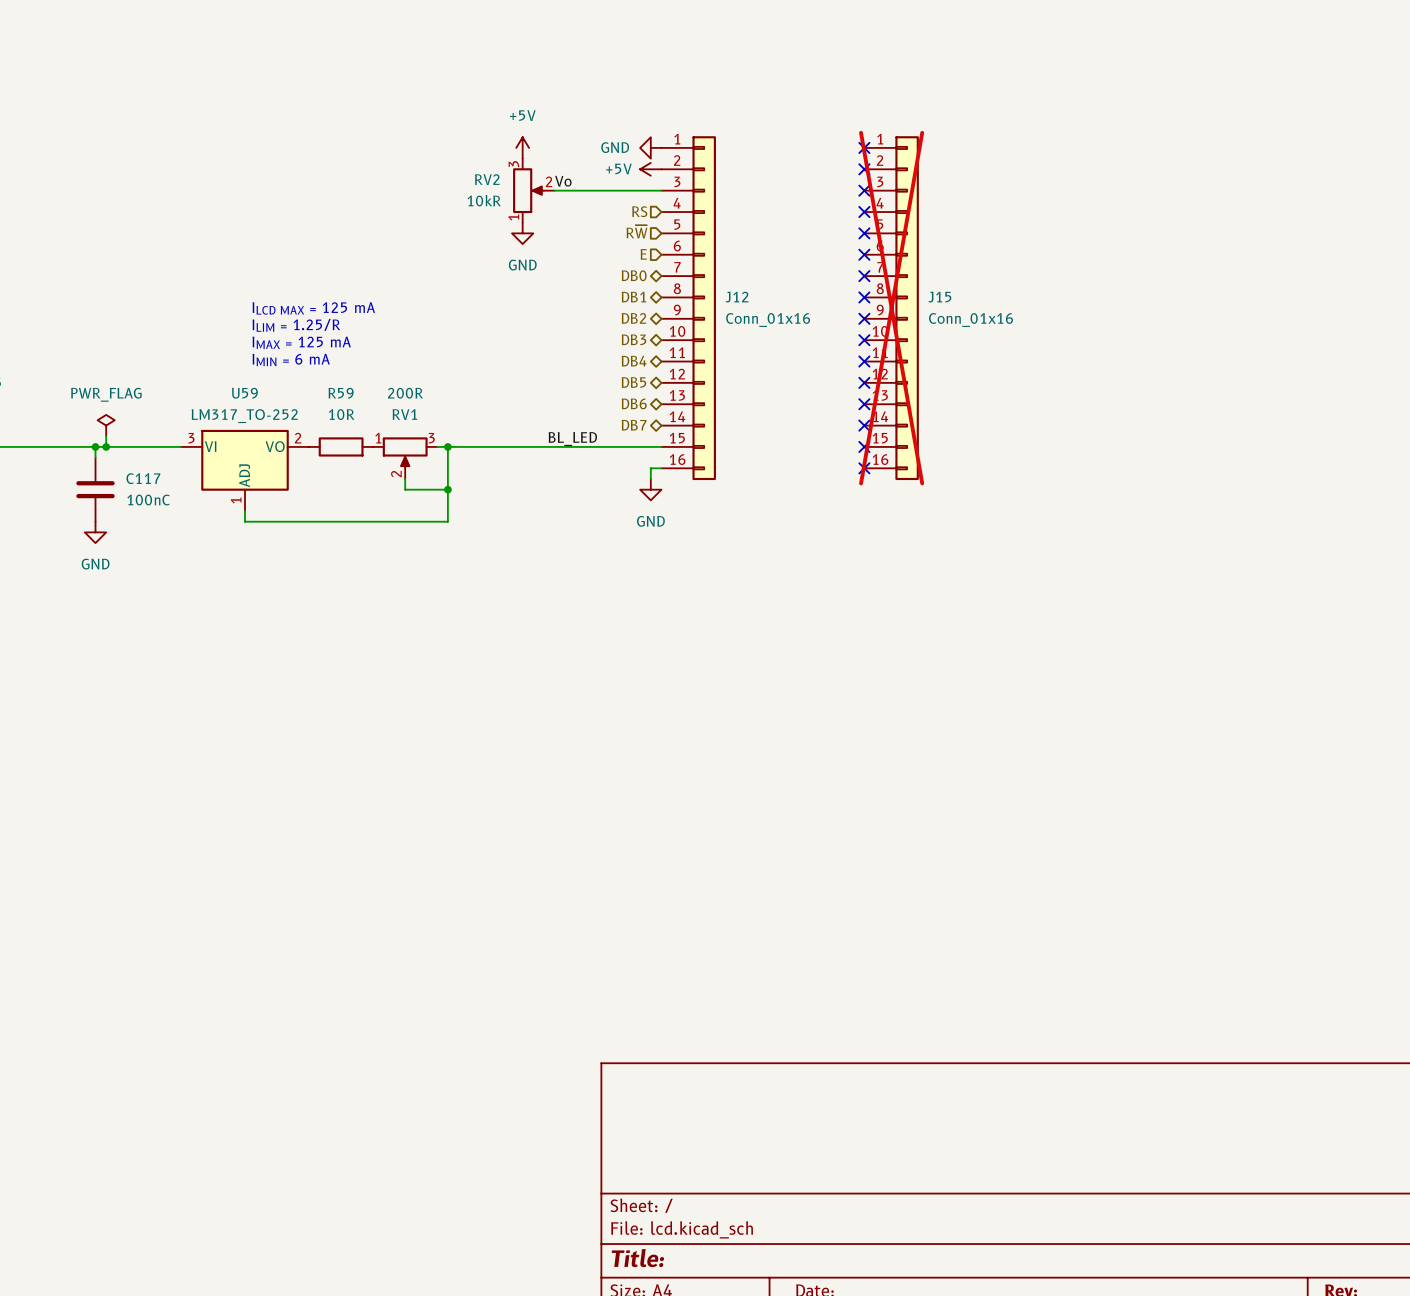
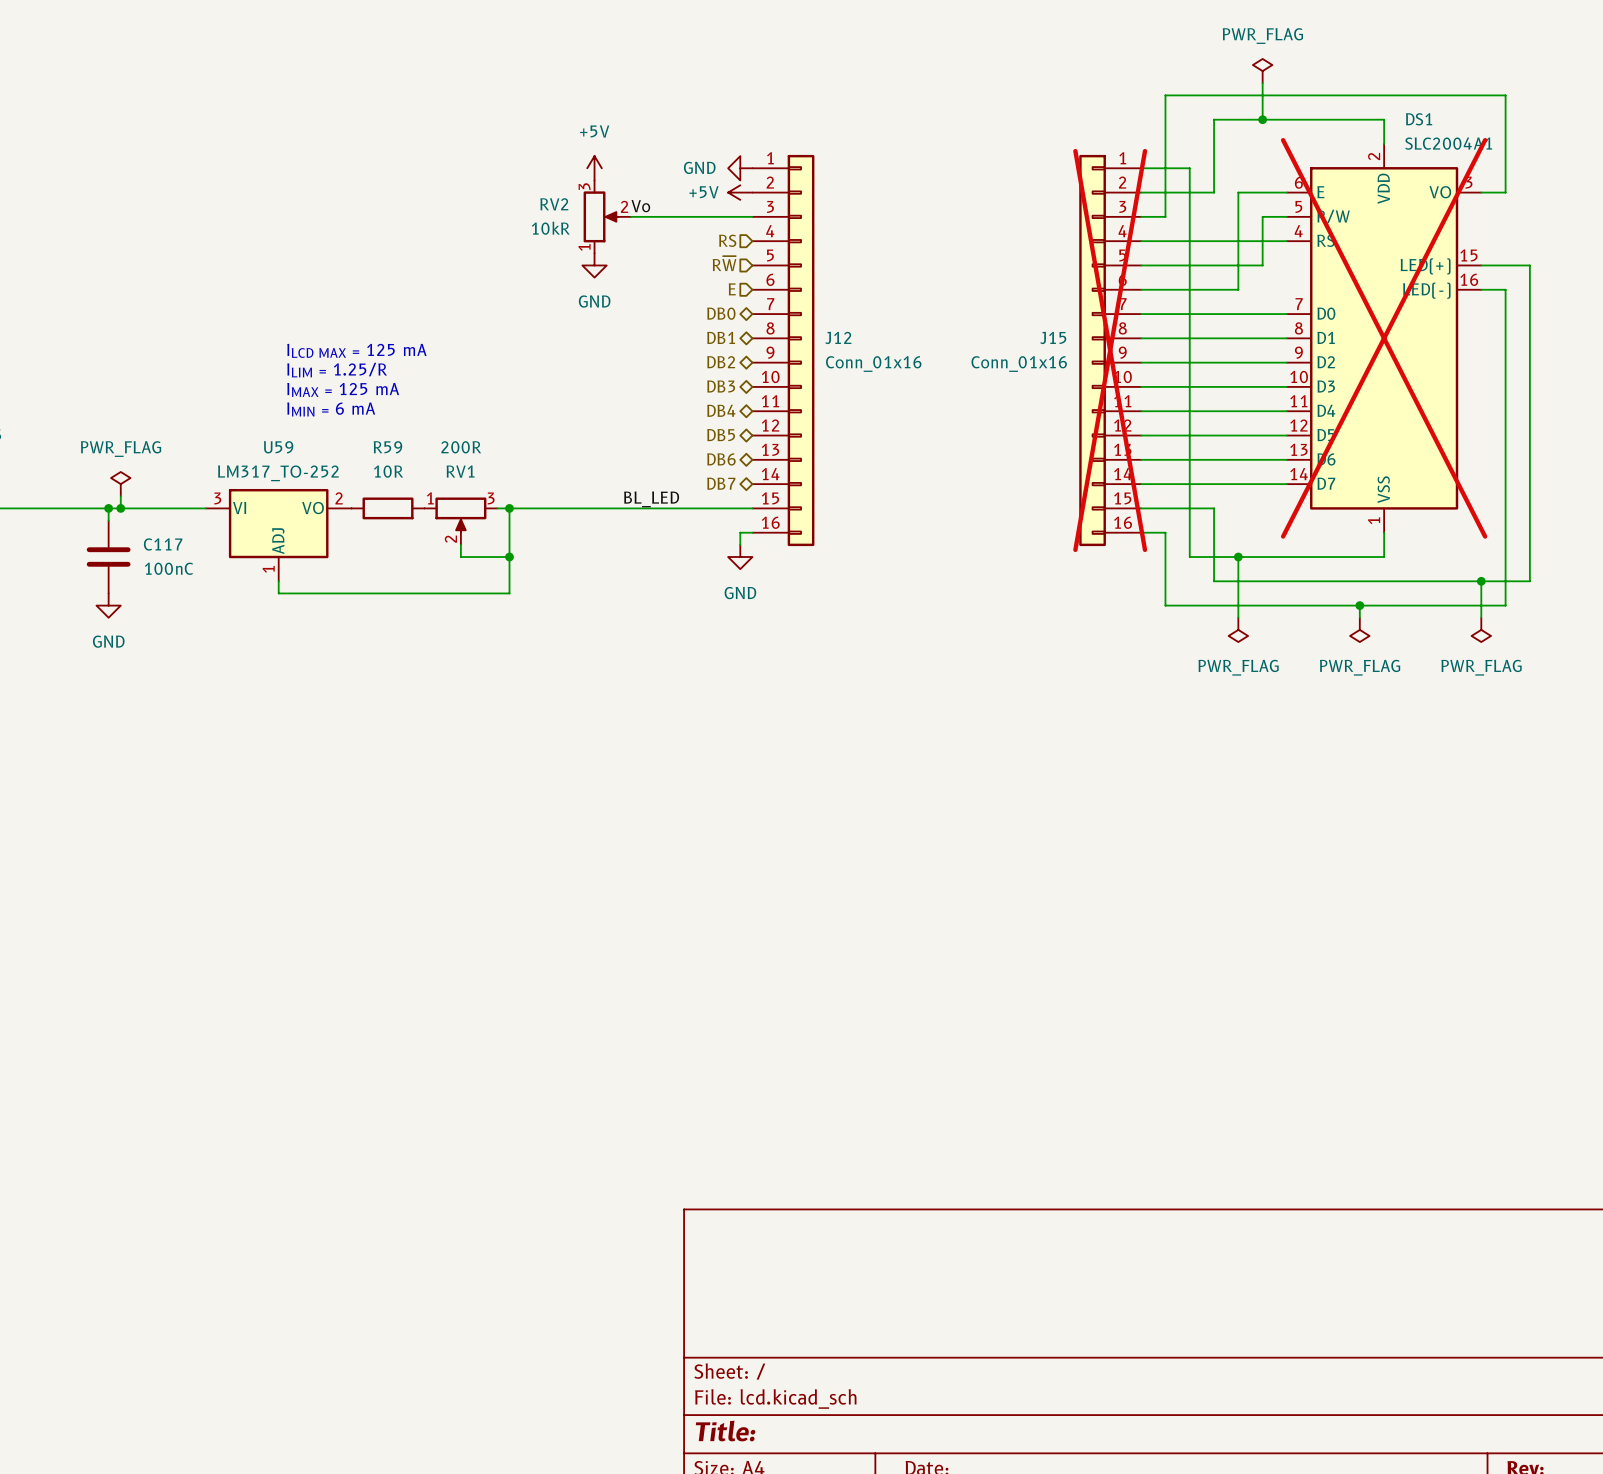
power symbol: none -> PWR_FLAG (1262, 71)
wire: none -> (1262, 83) (1262, 119)
junction: none -> (1262, 119)
wire: none -> (1384, 143) (1384, 119) (1214, 119) (1214, 192) (1141, 192)
no-connect mark: (864, 147) -> none
wire: none -> (1141, 168) (1189, 168) (1189, 557) (1384, 557) (1384, 532)
no-connect mark: (864, 169) -> none
wire: none -> (1286, 192) (1238, 192) (1238, 289) (1141, 289)
wire: none -> (1481, 192) (1505, 192) (1505, 95) (1165, 95) (1165, 216) (1141, 216)
no-connect mark: (864, 190) -> none
wire: none -> (1286, 216) (1262, 216) (1262, 265) (1141, 265)
no-connect mark: (864, 212) -> none
wire: none -> (1141, 241) (1286, 241)
no-connect mark: (864, 233) -> none
wire: none -> (1481, 265) (1529, 265) (1529, 581) (1214, 581) (1214, 508) (1141, 508)
no-connect mark: (864, 254) -> none
wire: none -> (1481, 289) (1505, 289) (1505, 605) (1165, 605) (1165, 532) (1141, 532)
no-connect mark: (864, 276) -> none
wire: none -> (1141, 314) (1286, 314)
no-connect mark: (864, 297) -> none
wire: none -> (1141, 338) (1286, 338)
DS1: none -> SLC2004A1 (1384, 338)
J15 flip: as is (907, 308) -> left-right (1092, 350)
no-connect mark: (864, 318) -> none
wire: none -> (1141, 362) (1286, 362)
no-connect mark: (864, 340) -> none
wire: none -> (1141, 386) (1286, 386)
no-connect mark: (864, 361) -> none
wire: none -> (1141, 411) (1286, 411)
no-connect mark: (864, 382) -> none
wire: none -> (1141, 435) (1286, 435)
no-connect mark: (864, 404) -> none
wire: none -> (1141, 459) (1286, 459)
no-connect mark: (864, 425) -> none
wire: none -> (1141, 484) (1286, 484)
no-connect mark: (864, 446) -> none
no-connect mark: (864, 468) -> none
wire: none -> (1238, 557) (1238, 617)
junction: none -> (1238, 557)
wire: none -> (1481, 581) (1481, 617)
junction: none -> (1481, 581)
wire: none -> (1359, 605) (1359, 617)
junction: none -> (1359, 605)
power symbol: none -> PWR_FLAG (1238, 629)
power symbol: none -> PWR_FLAG (1359, 629)
power symbol: none -> PWR_FLAG (1481, 629)

